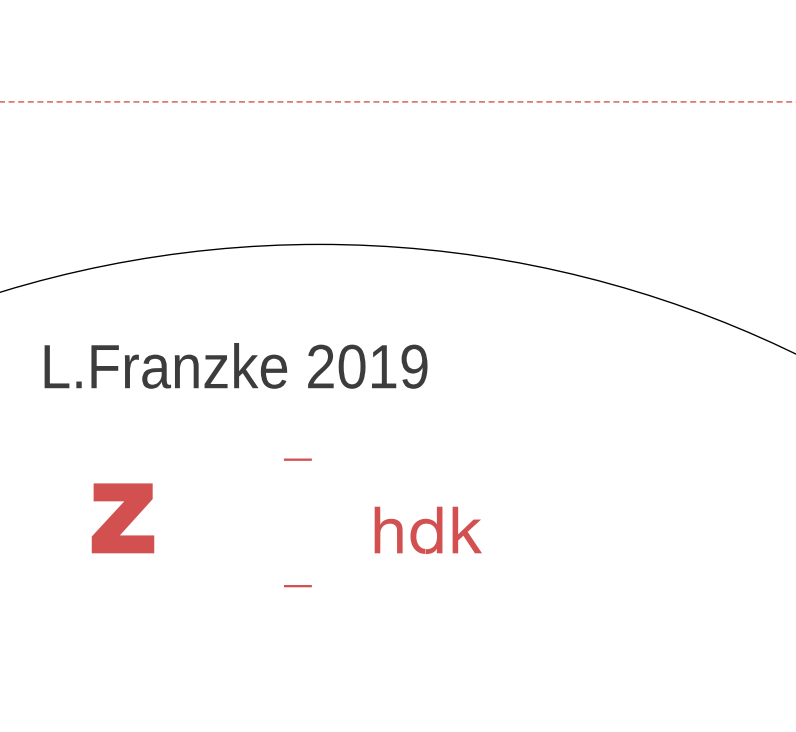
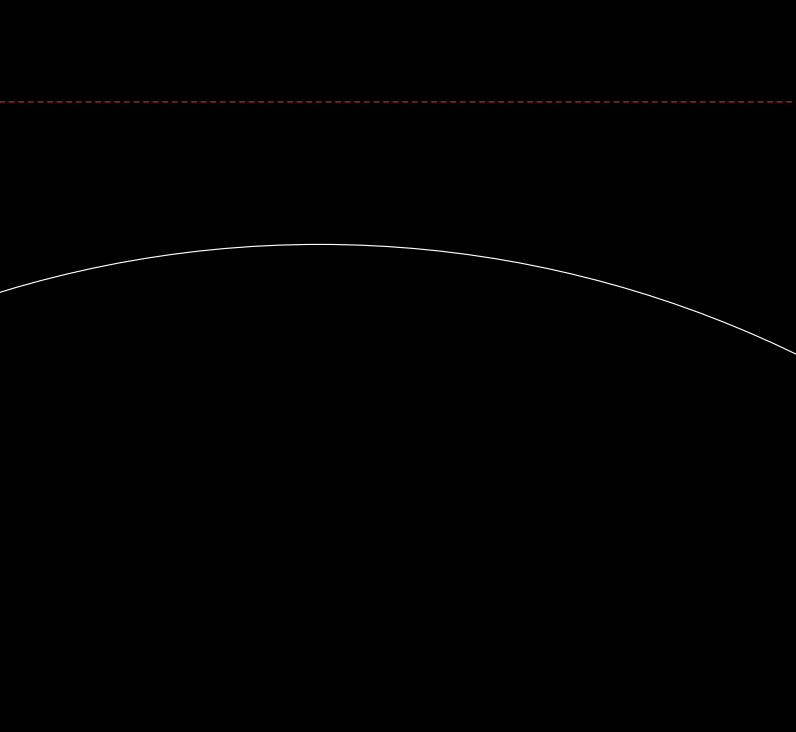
text: L.Franzke 2019 (236, 365) -> none
drawing: [91, 458, 483, 588] -> none

